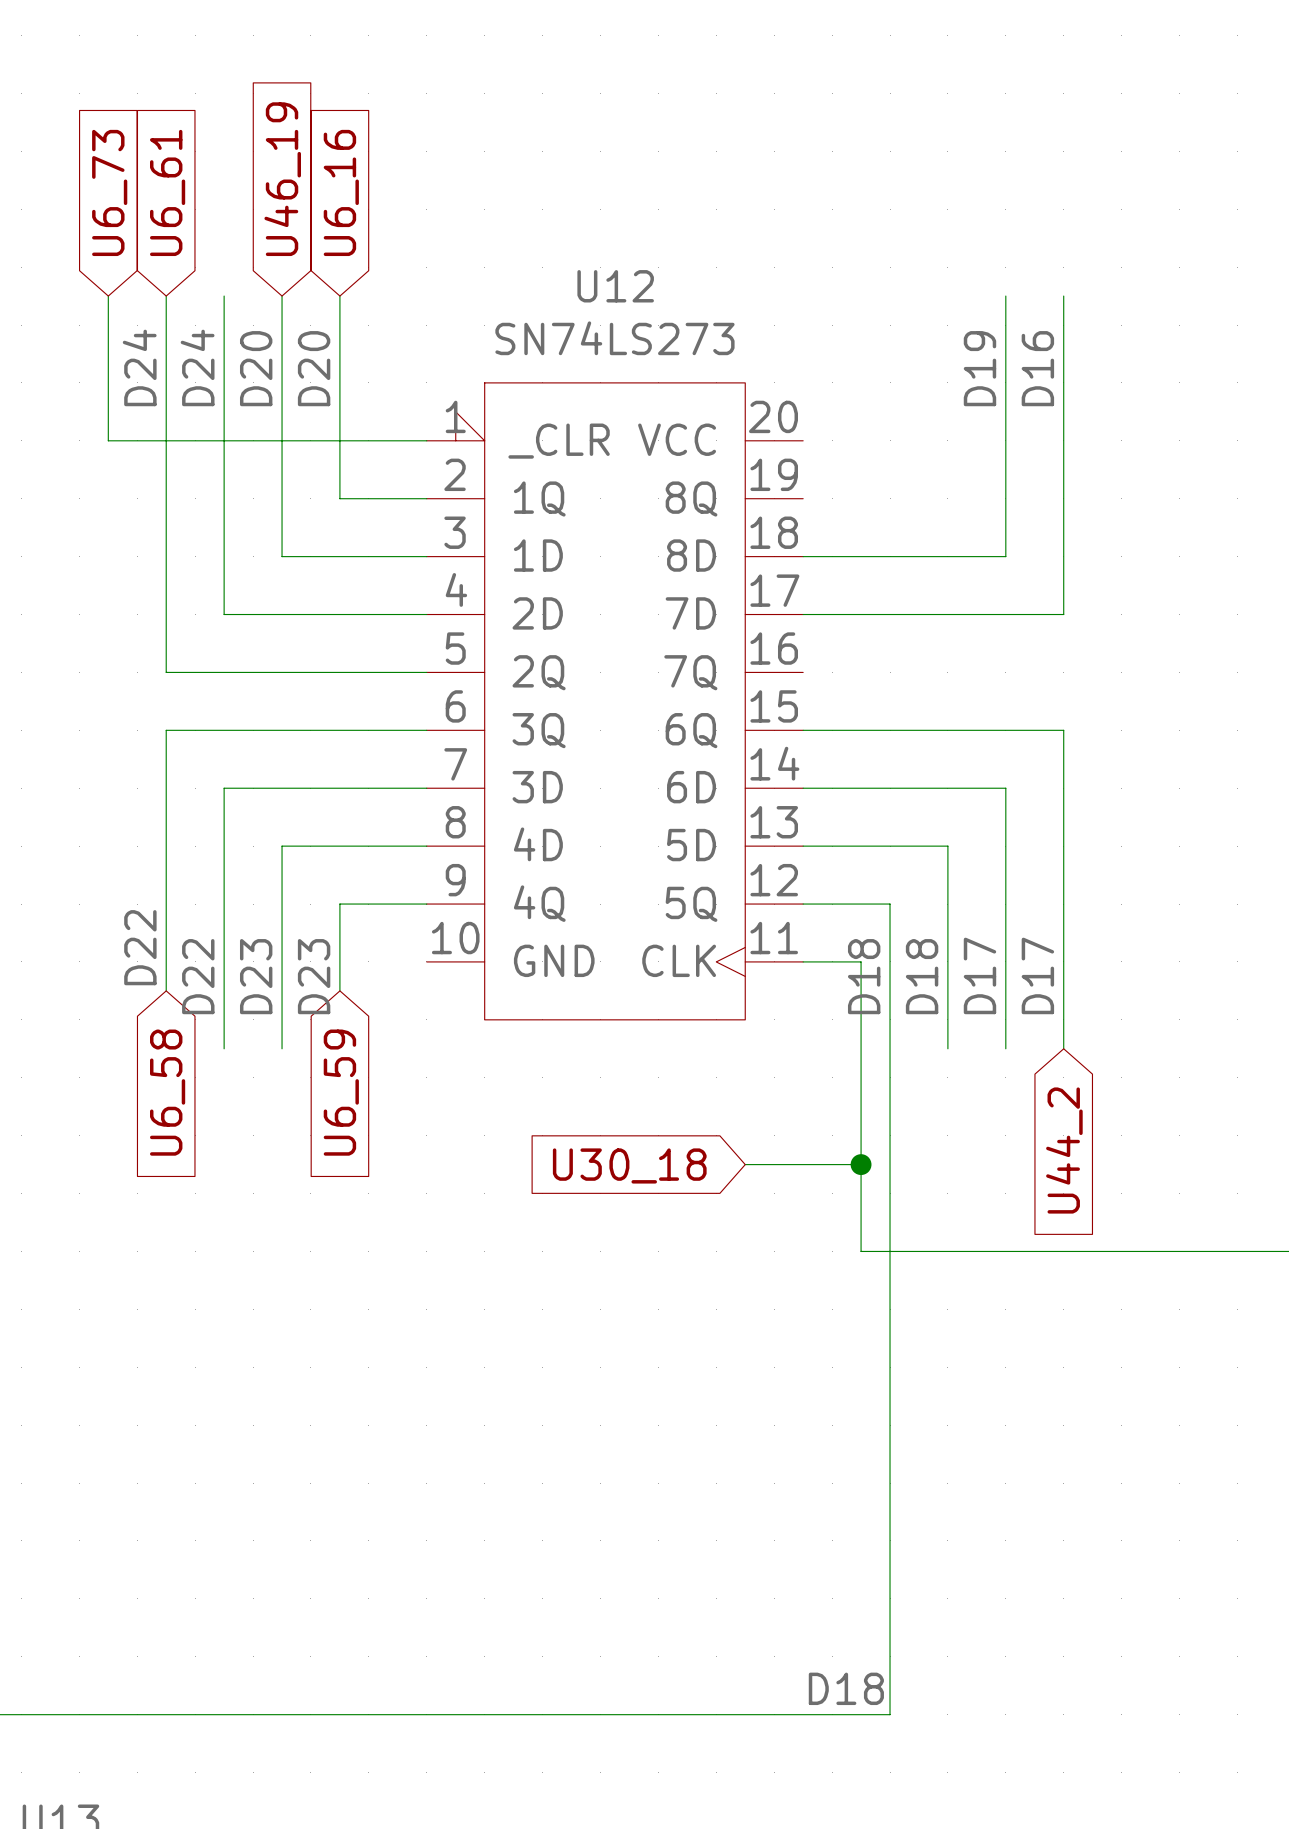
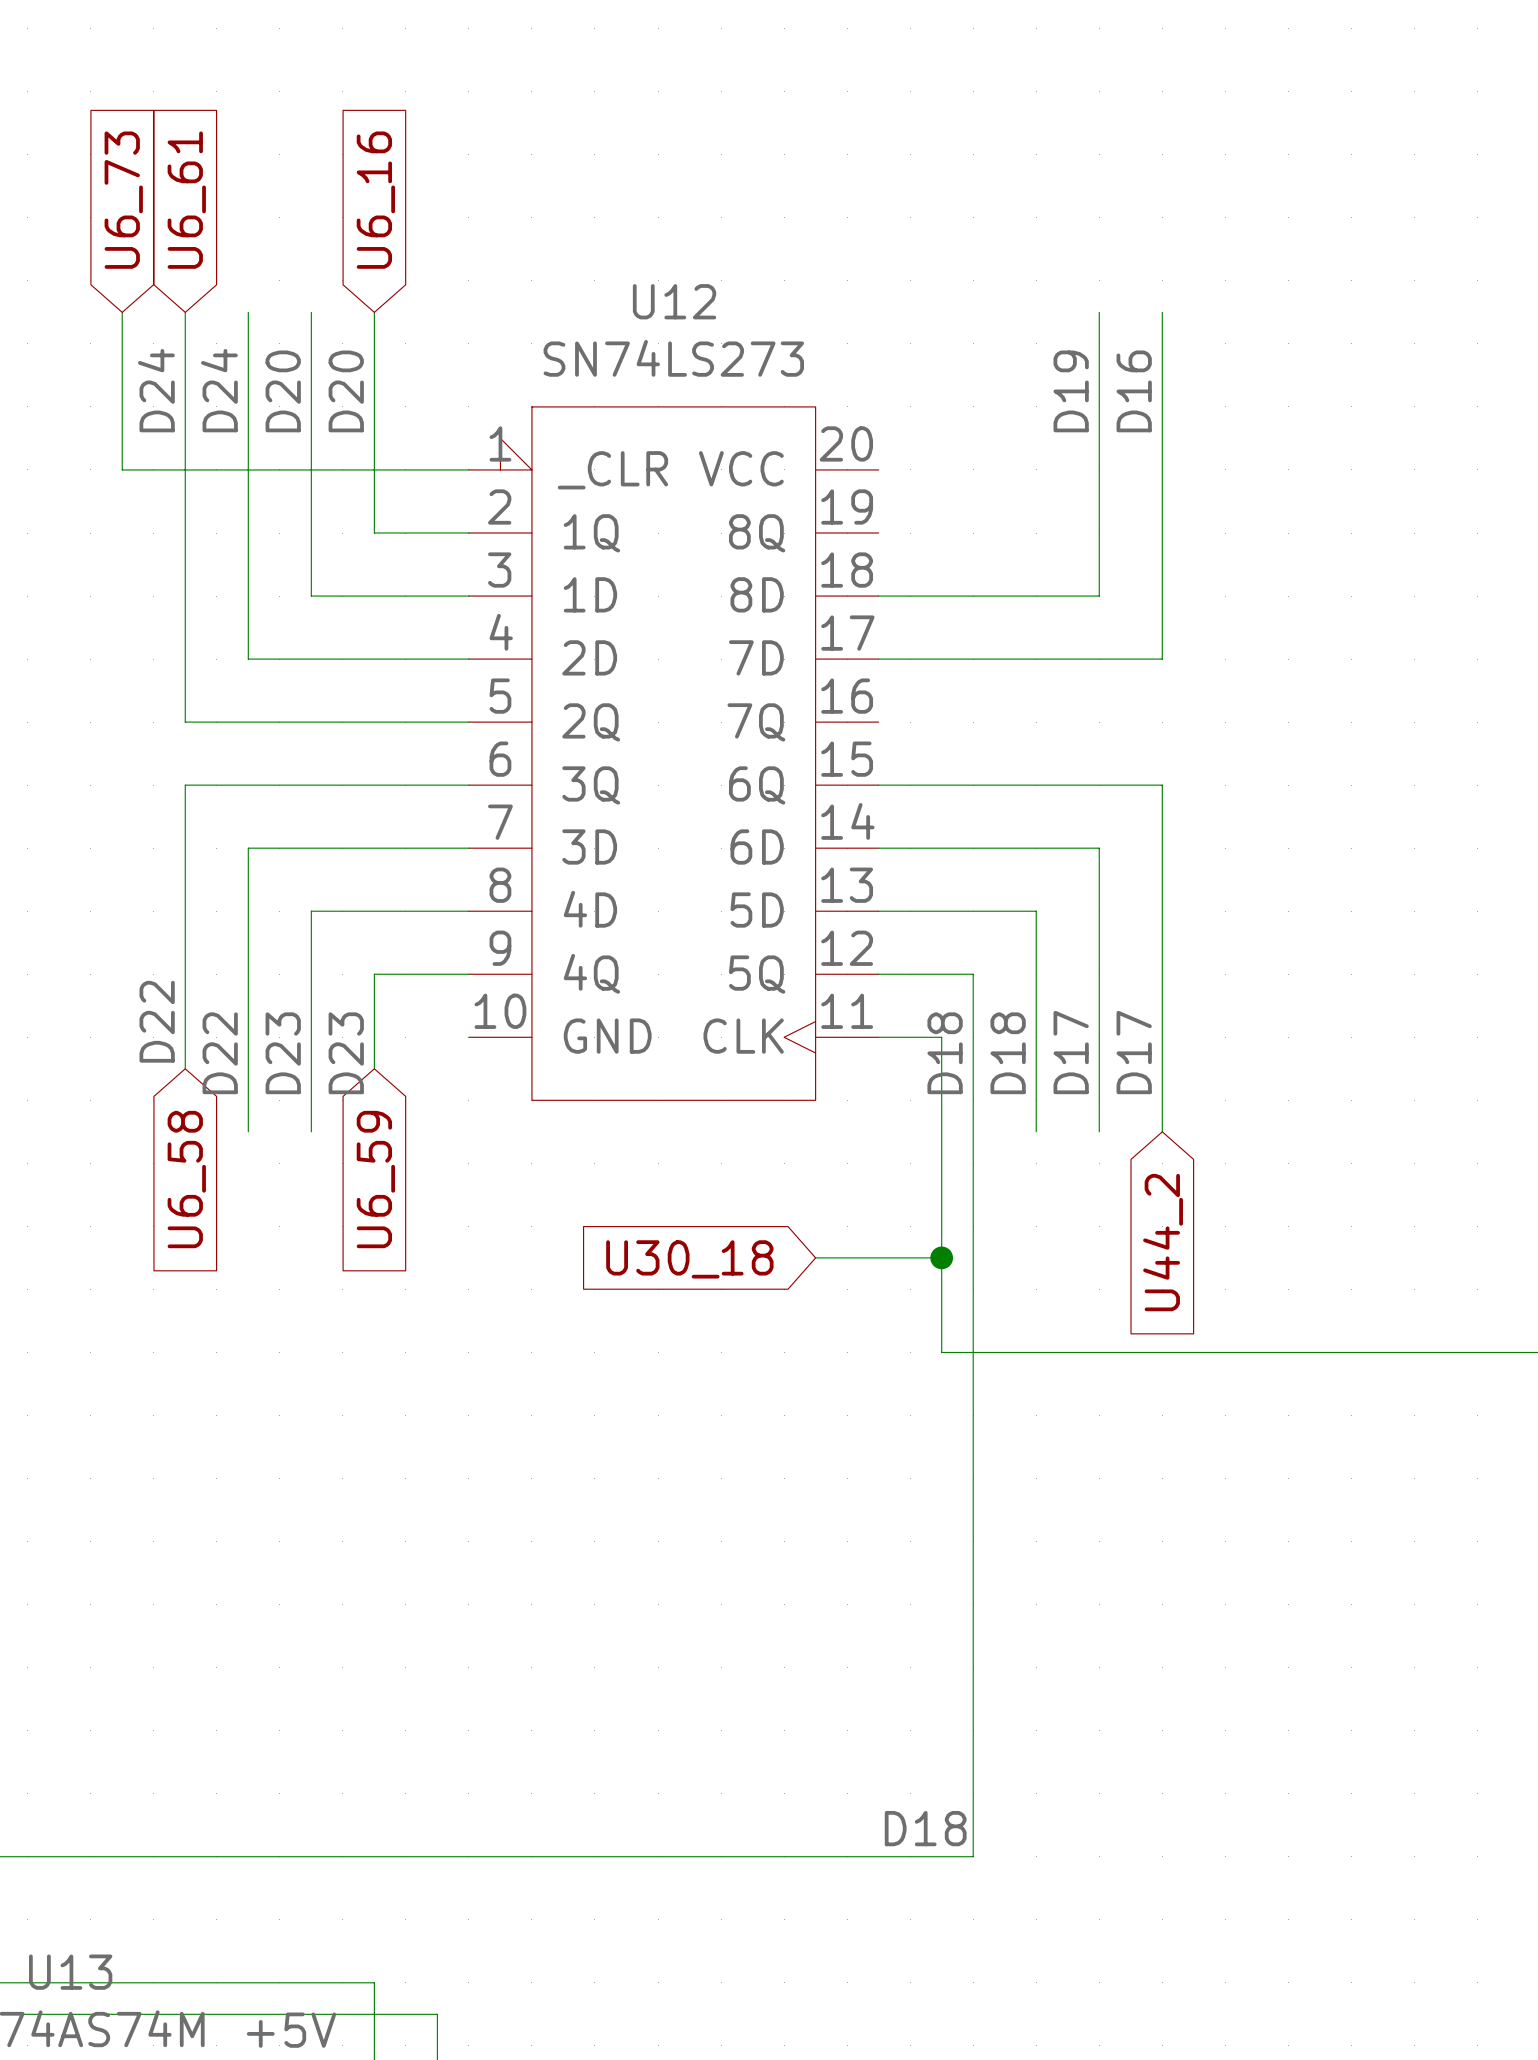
global label: U46_19 (282, 179) -> none

